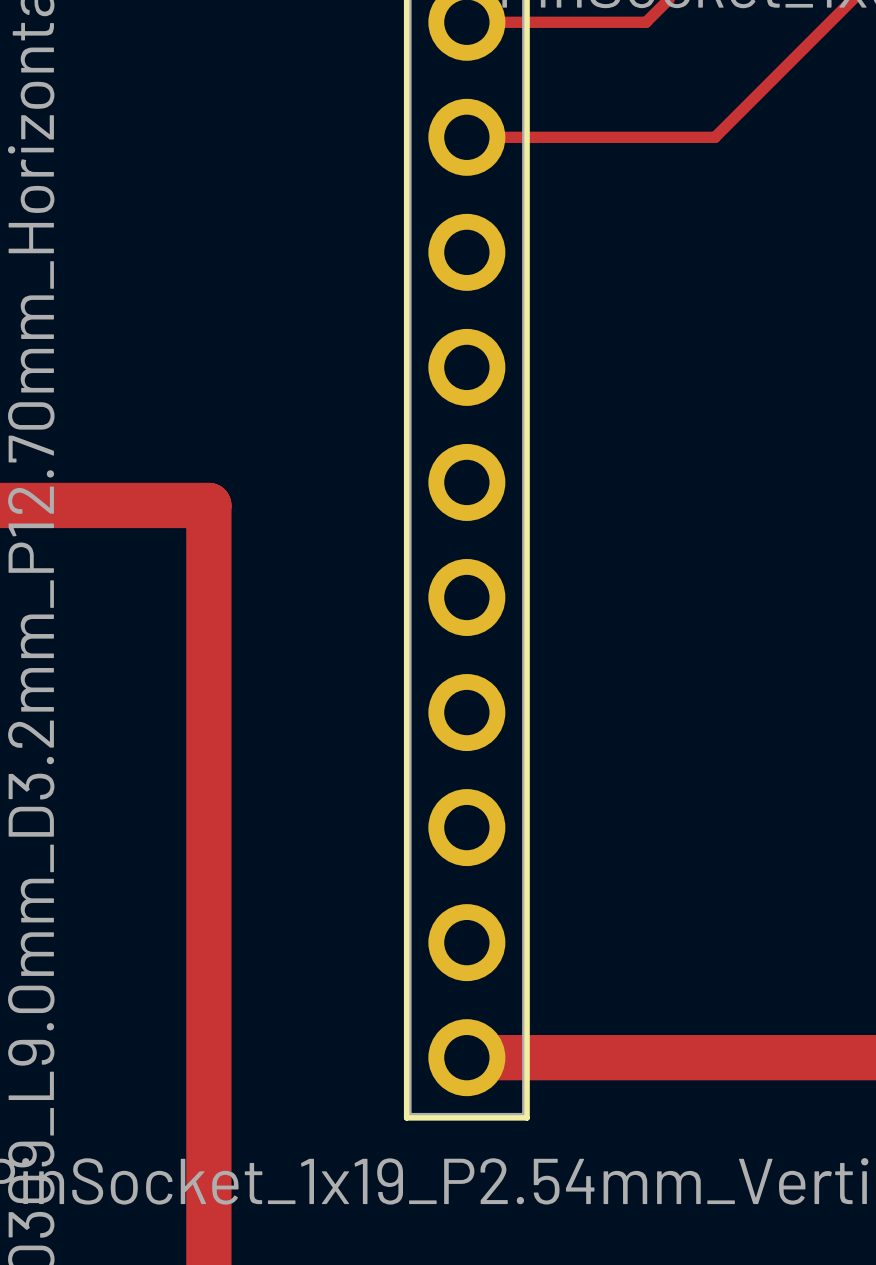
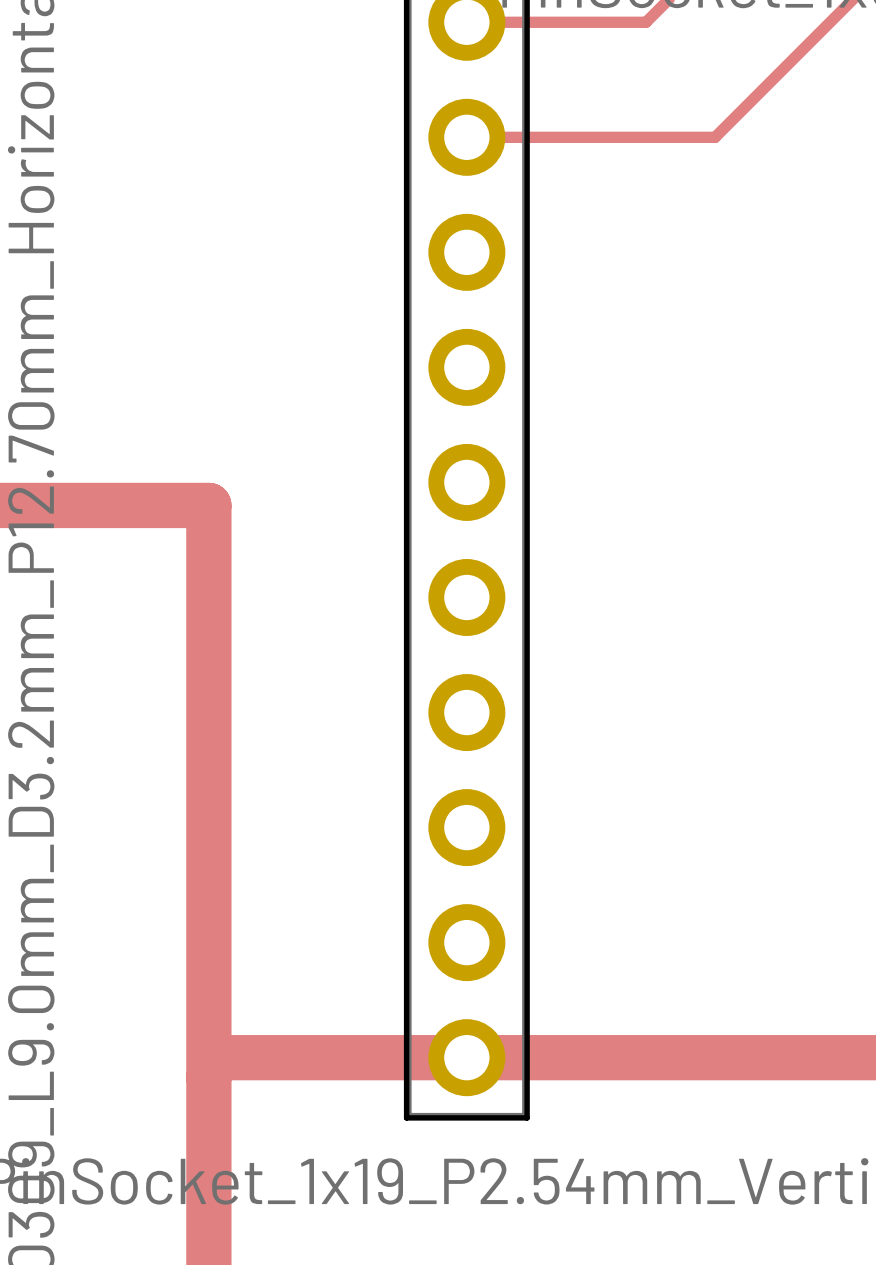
track: none -> (466, 1057) (228, 1057) (208, 1077)

